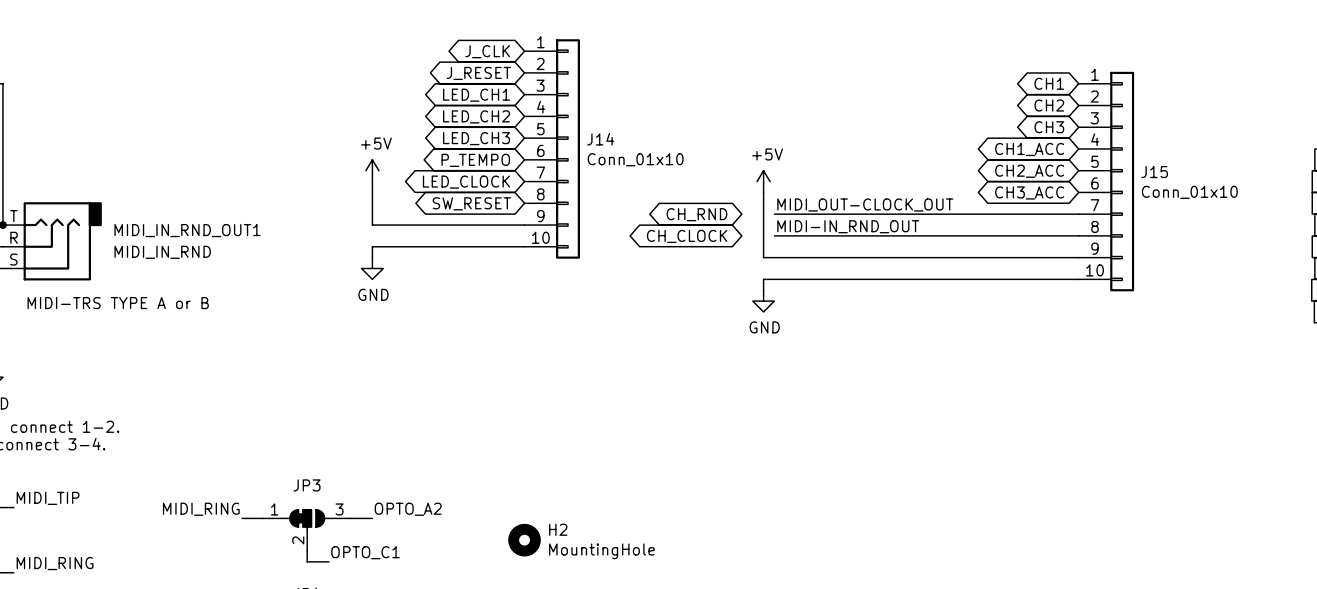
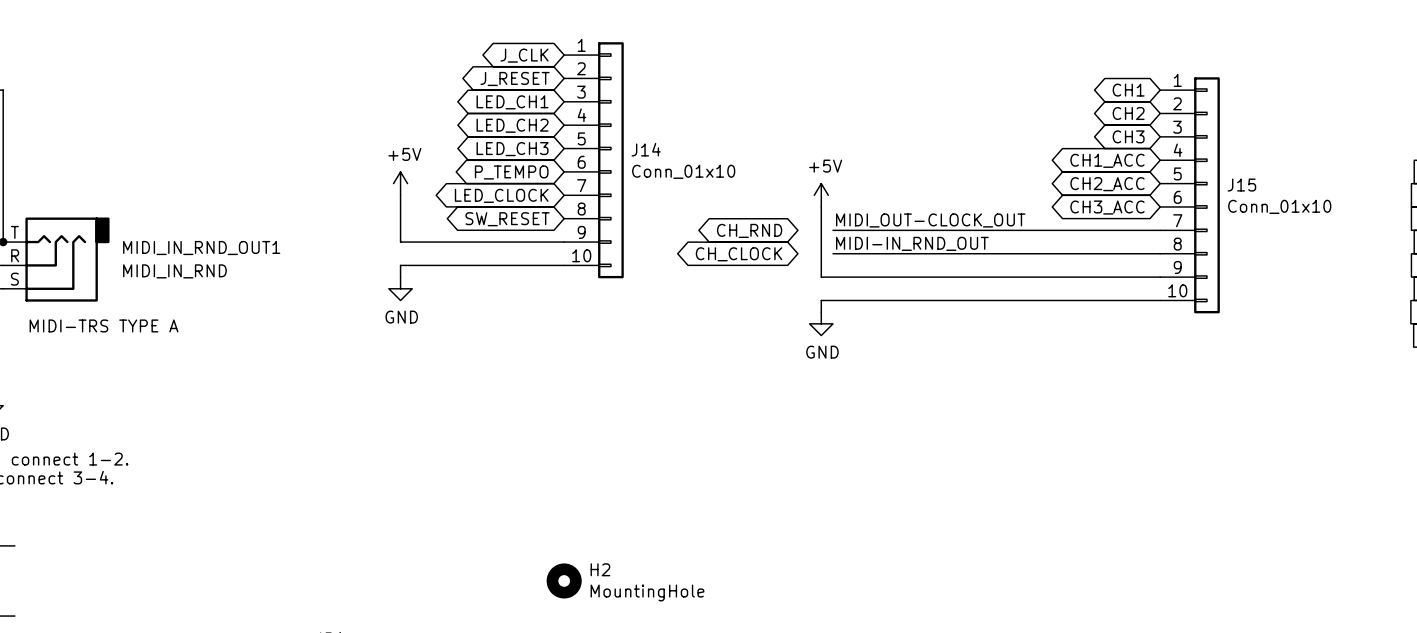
text: MIDI-TRS TYPE A or B (118, 303) -> MIDI-TRS TYPE A (104, 325)
label: MIDI_TIP (48, 498) -> none
label: MIDI_RING (201, 509) -> none
label: OPTO_A2 (408, 509) -> none
wire: (242, 518) (263, 518) -> none
wire: (350, 518) (372, 518) -> none
JP3: (307, 530) -> none
wire: (307, 551) (307, 561) (328, 561) -> none
label: OPTO_C1 (365, 552) -> none
label: MIDI_RING (55, 563) -> none

